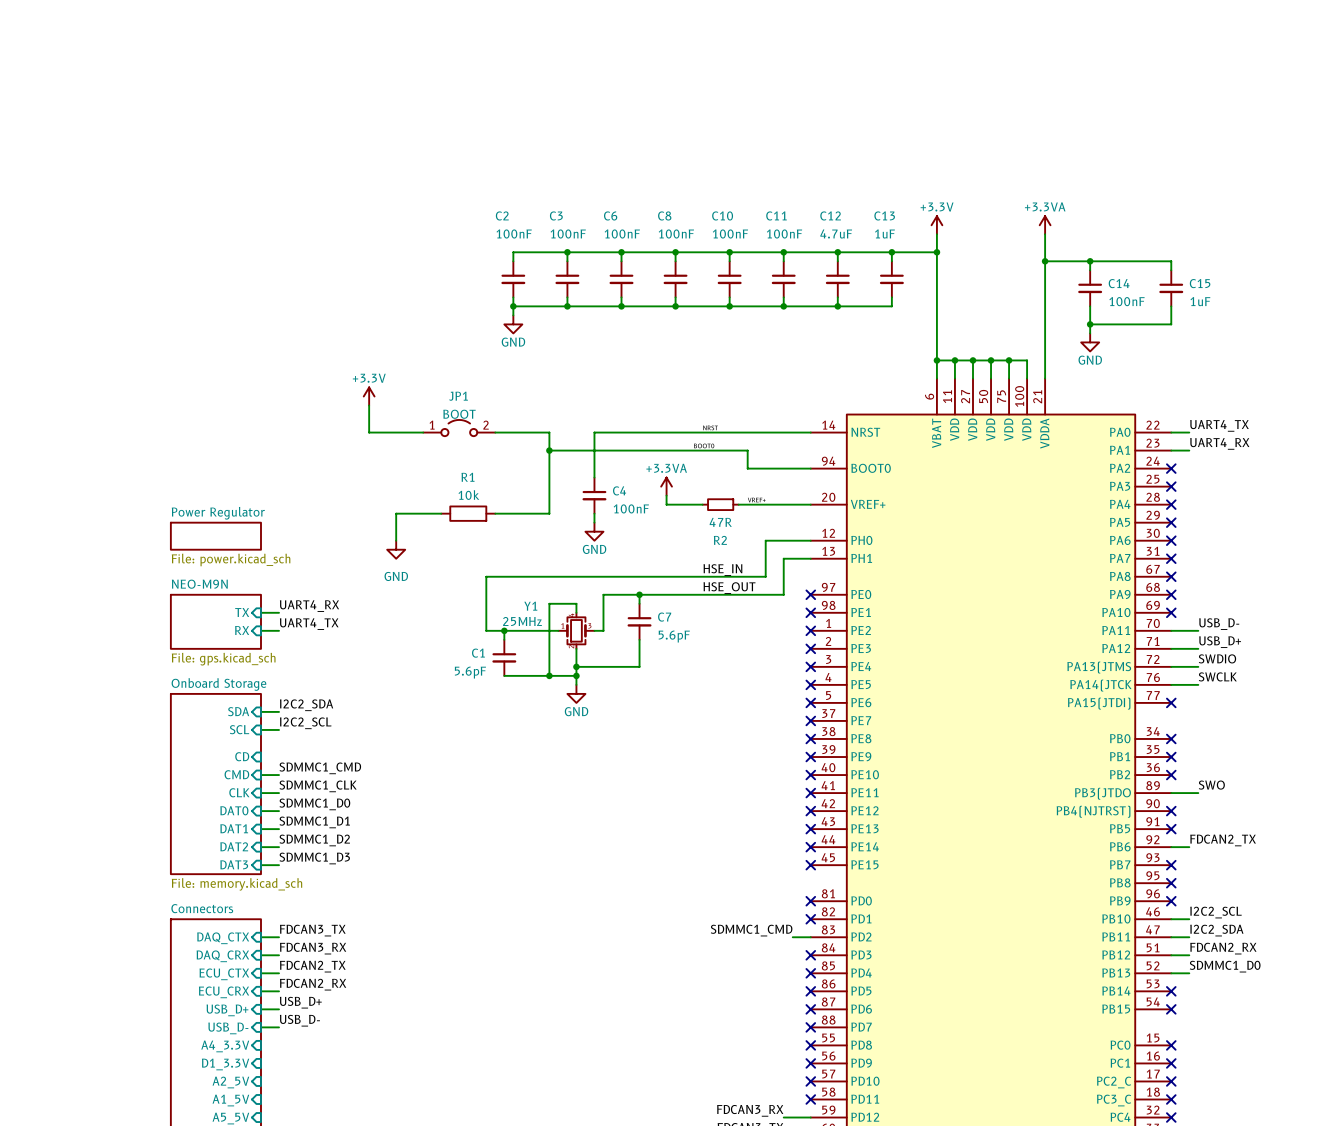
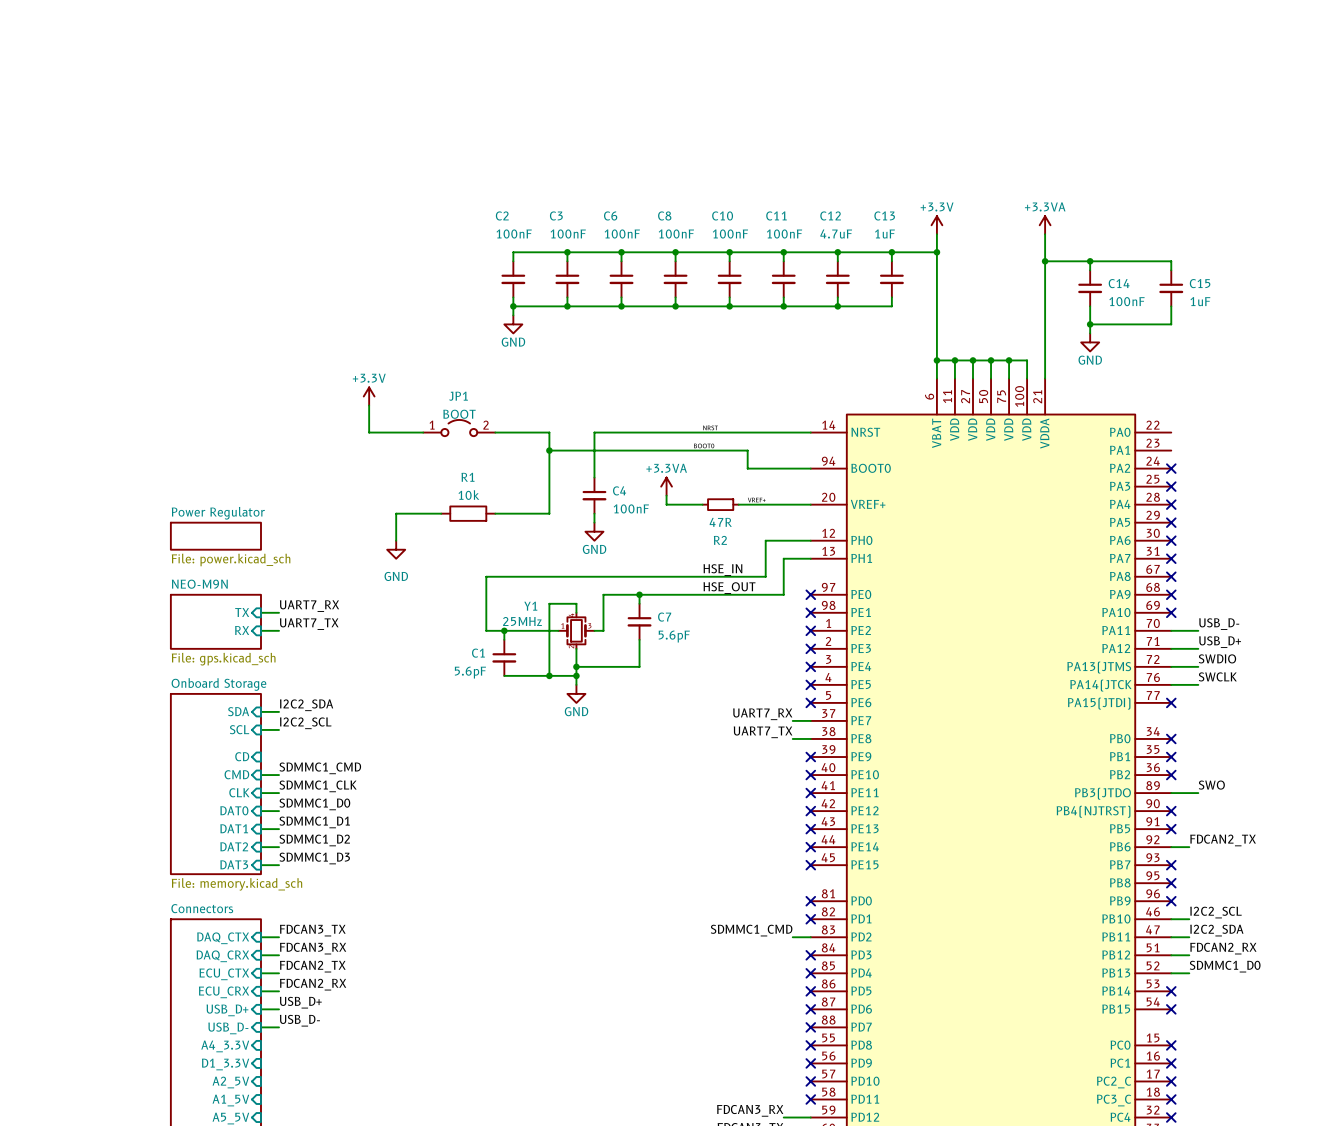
label: UART4_TX (1219, 425) -> none
wire: (1171, 432) (1189, 432) -> none
label: UART4_RX (1219, 443) -> none
wire: (1171, 450) (1189, 450) -> none
label: UART4_RX (309, 606) -> UART7_RX (309, 606)
label: UART4_TX (309, 624) -> UART7_TX (309, 624)
label: none -> UART7_RX (762, 714)
wire: none -> (792, 720) (810, 720)
no-connect mark: (810, 720) -> none
label: none -> UART7_TX (763, 732)
wire: none -> (792, 738) (810, 738)
no-connect mark: (810, 738) -> none

